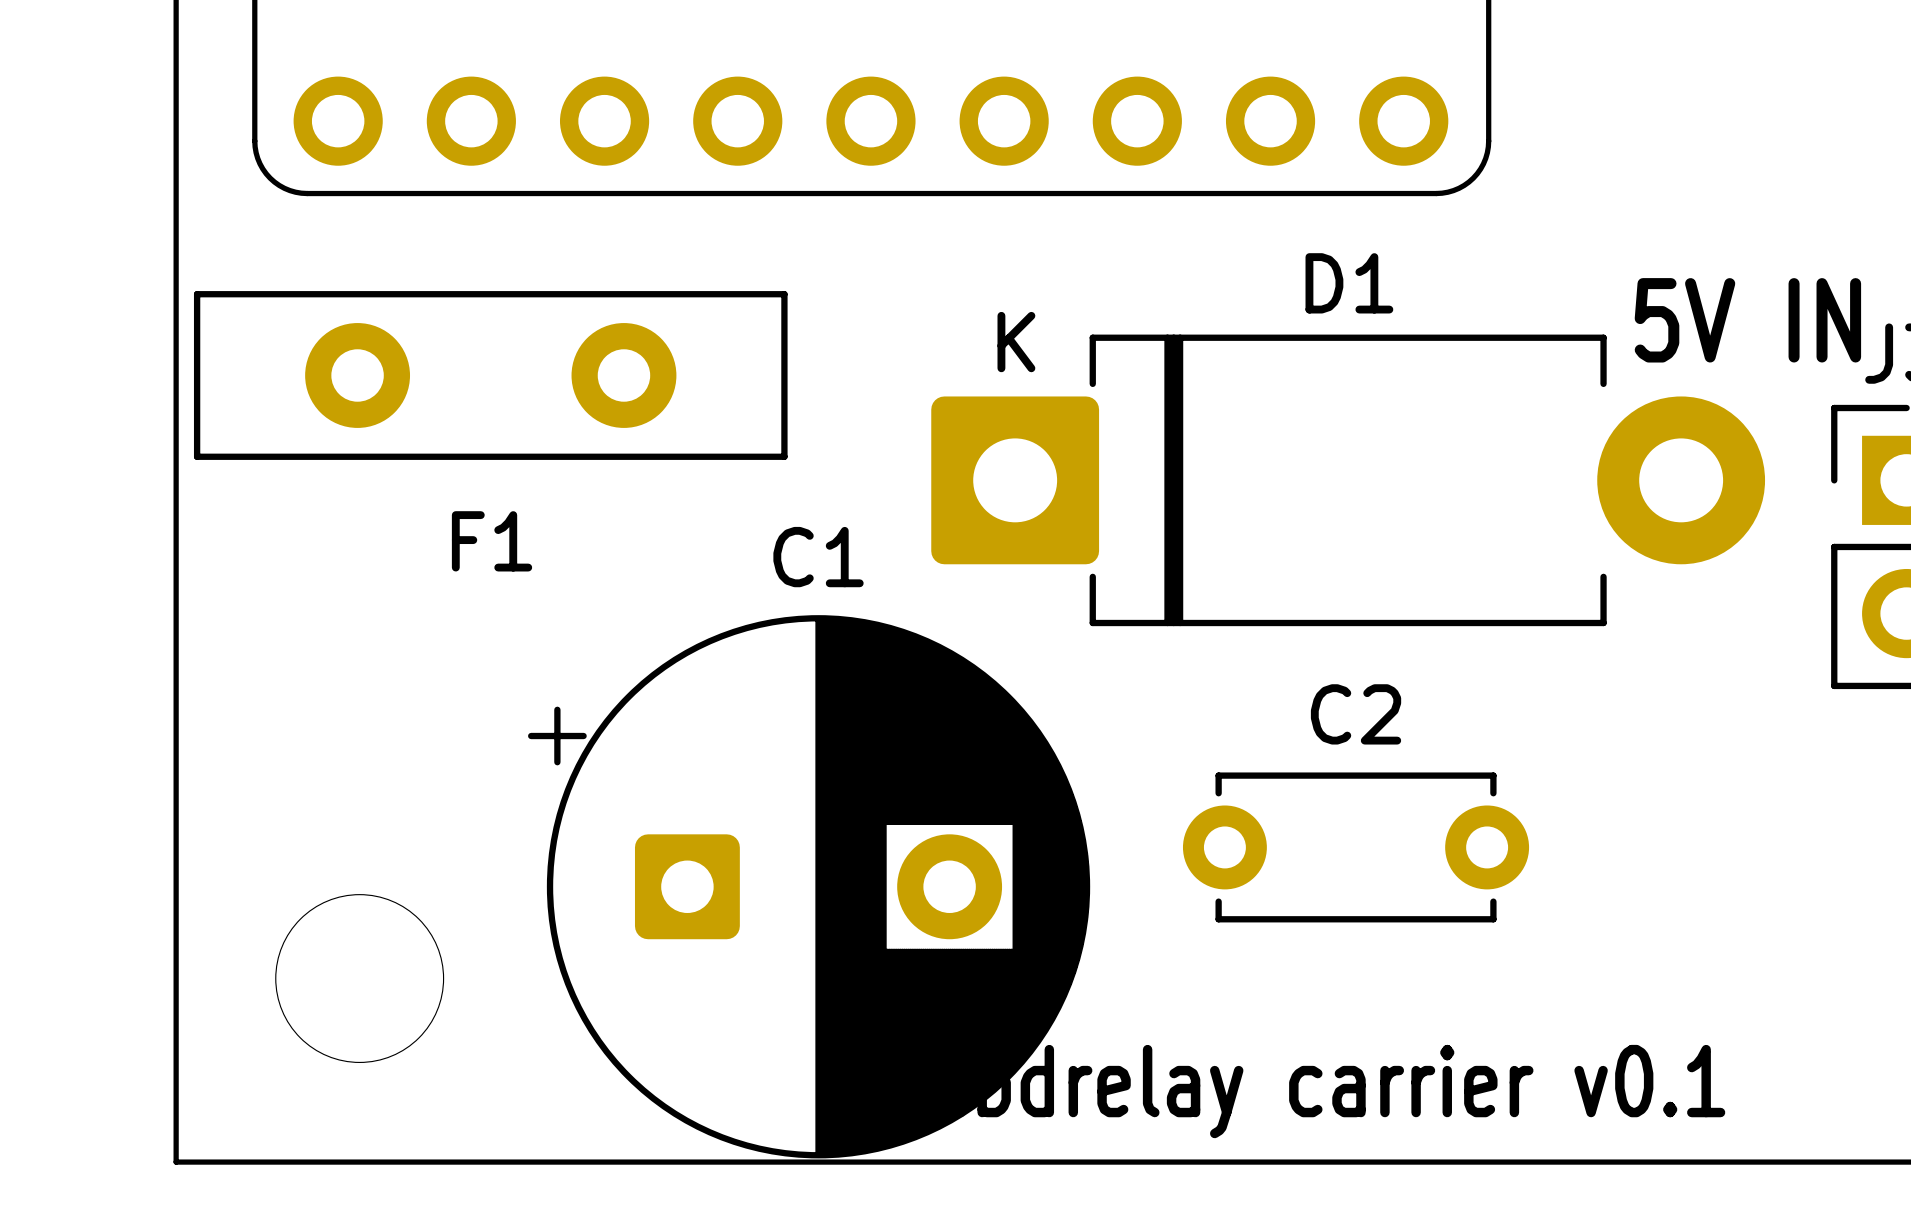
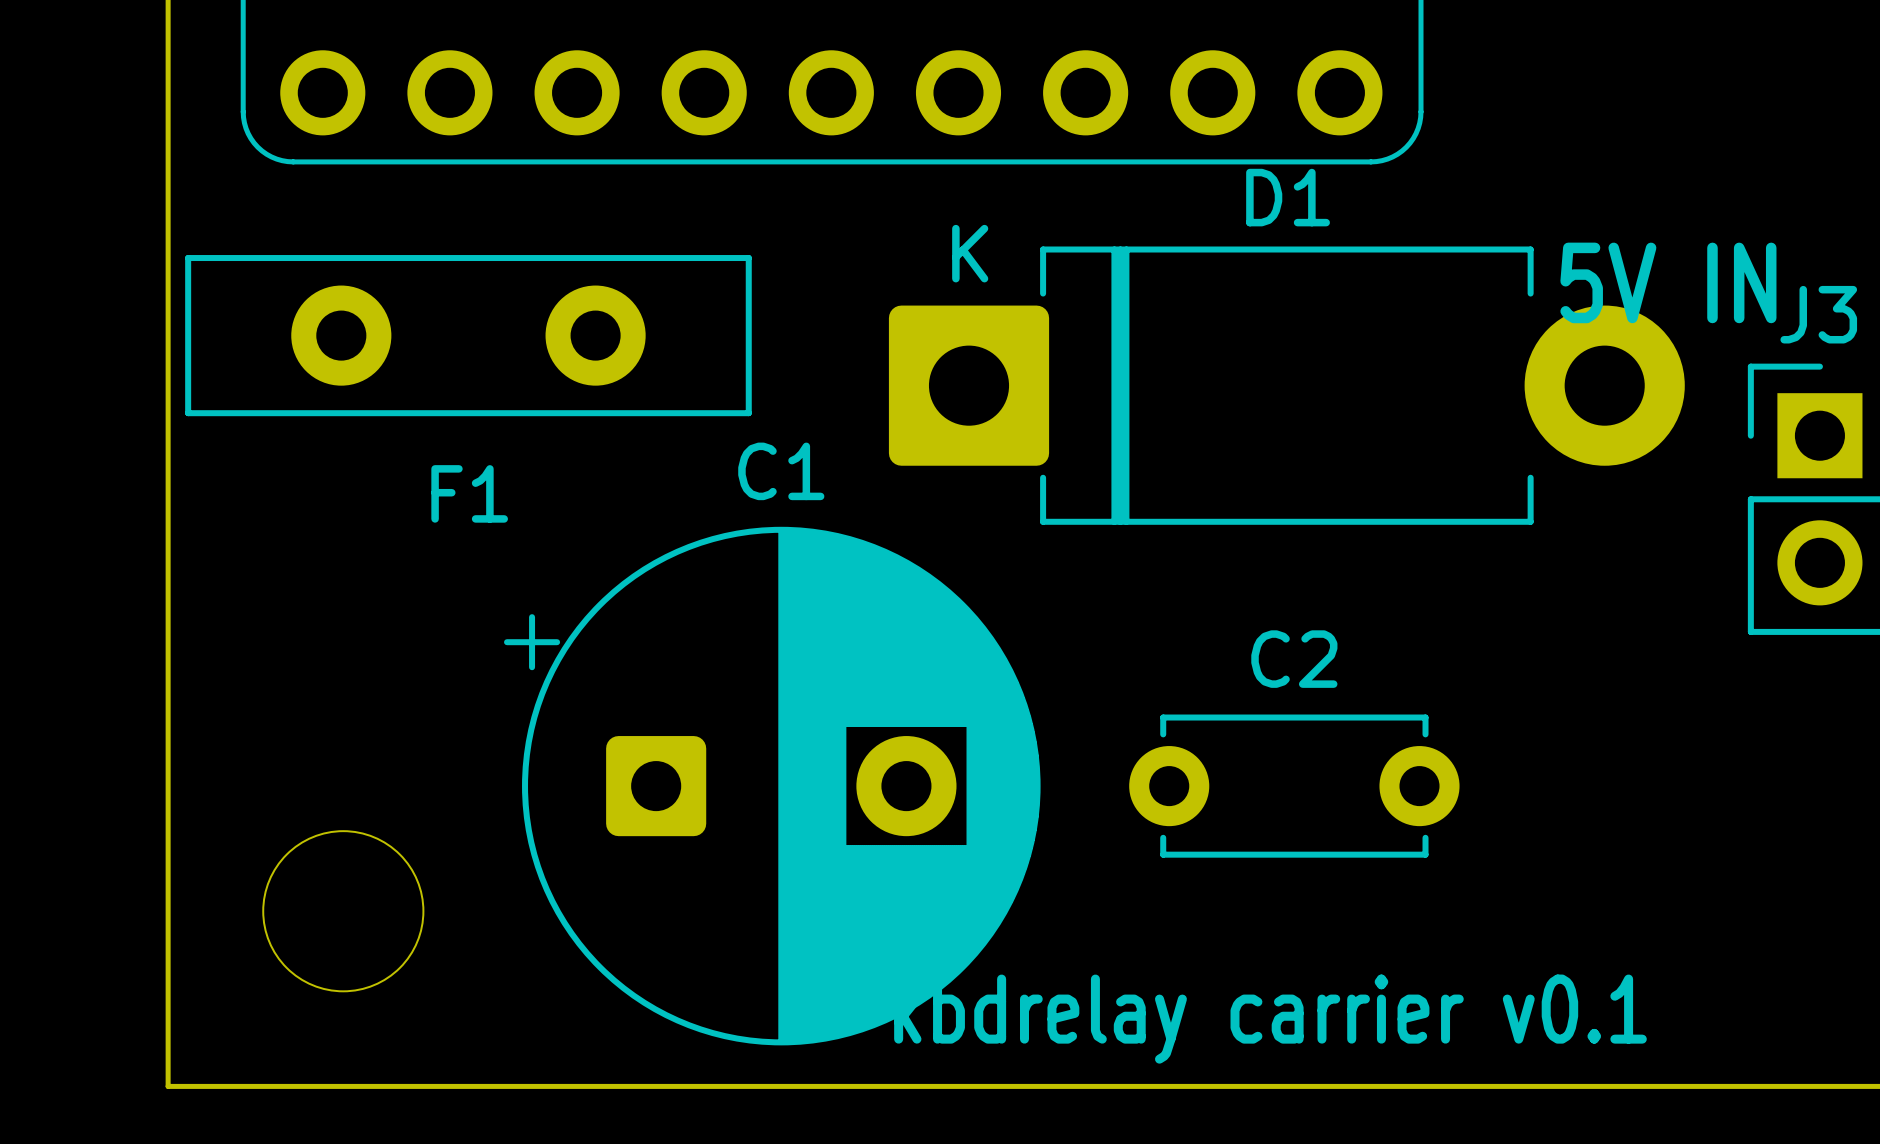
D1 position: (1348, 480) -> (1286, 385)
C1 position: (809, 886) -> (772, 786)

